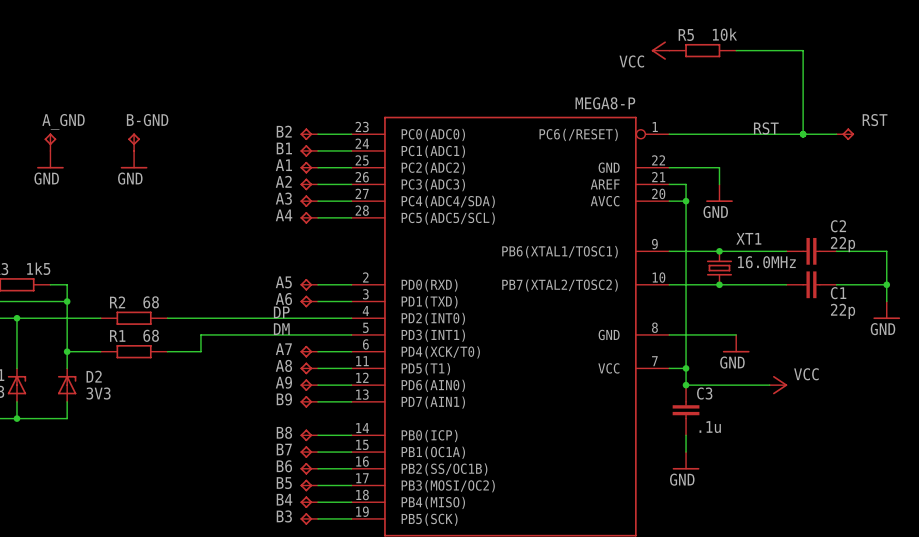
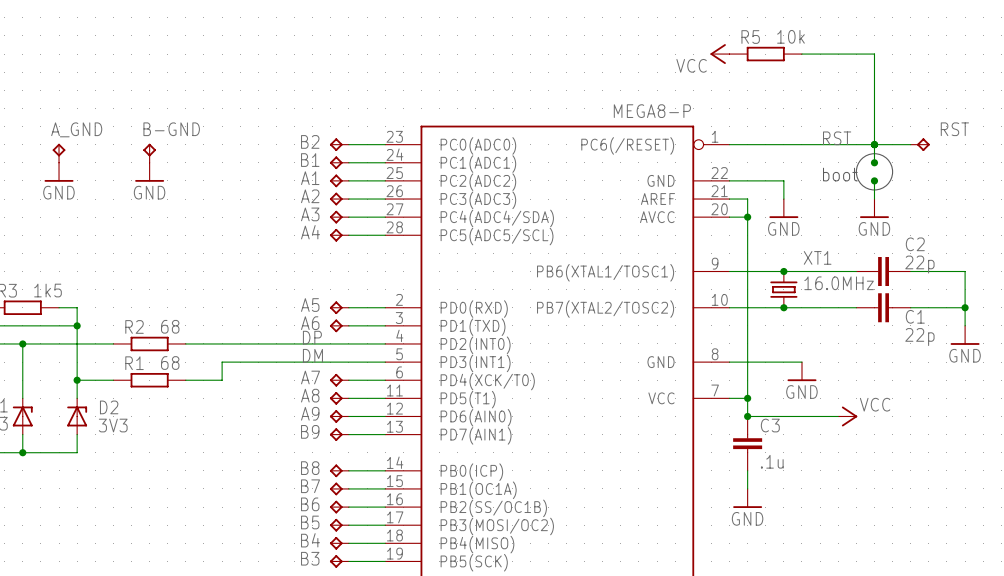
wire: none -> (874, 144) (874, 162)
drawing: none -> [855, 153, 894, 191]
junction: none -> (874, 162)
text: none -> boot (840, 174)
wire: none -> (874, 180) (874, 199)
junction: none -> (874, 180)
power symbol: none -> GND (874, 208)

